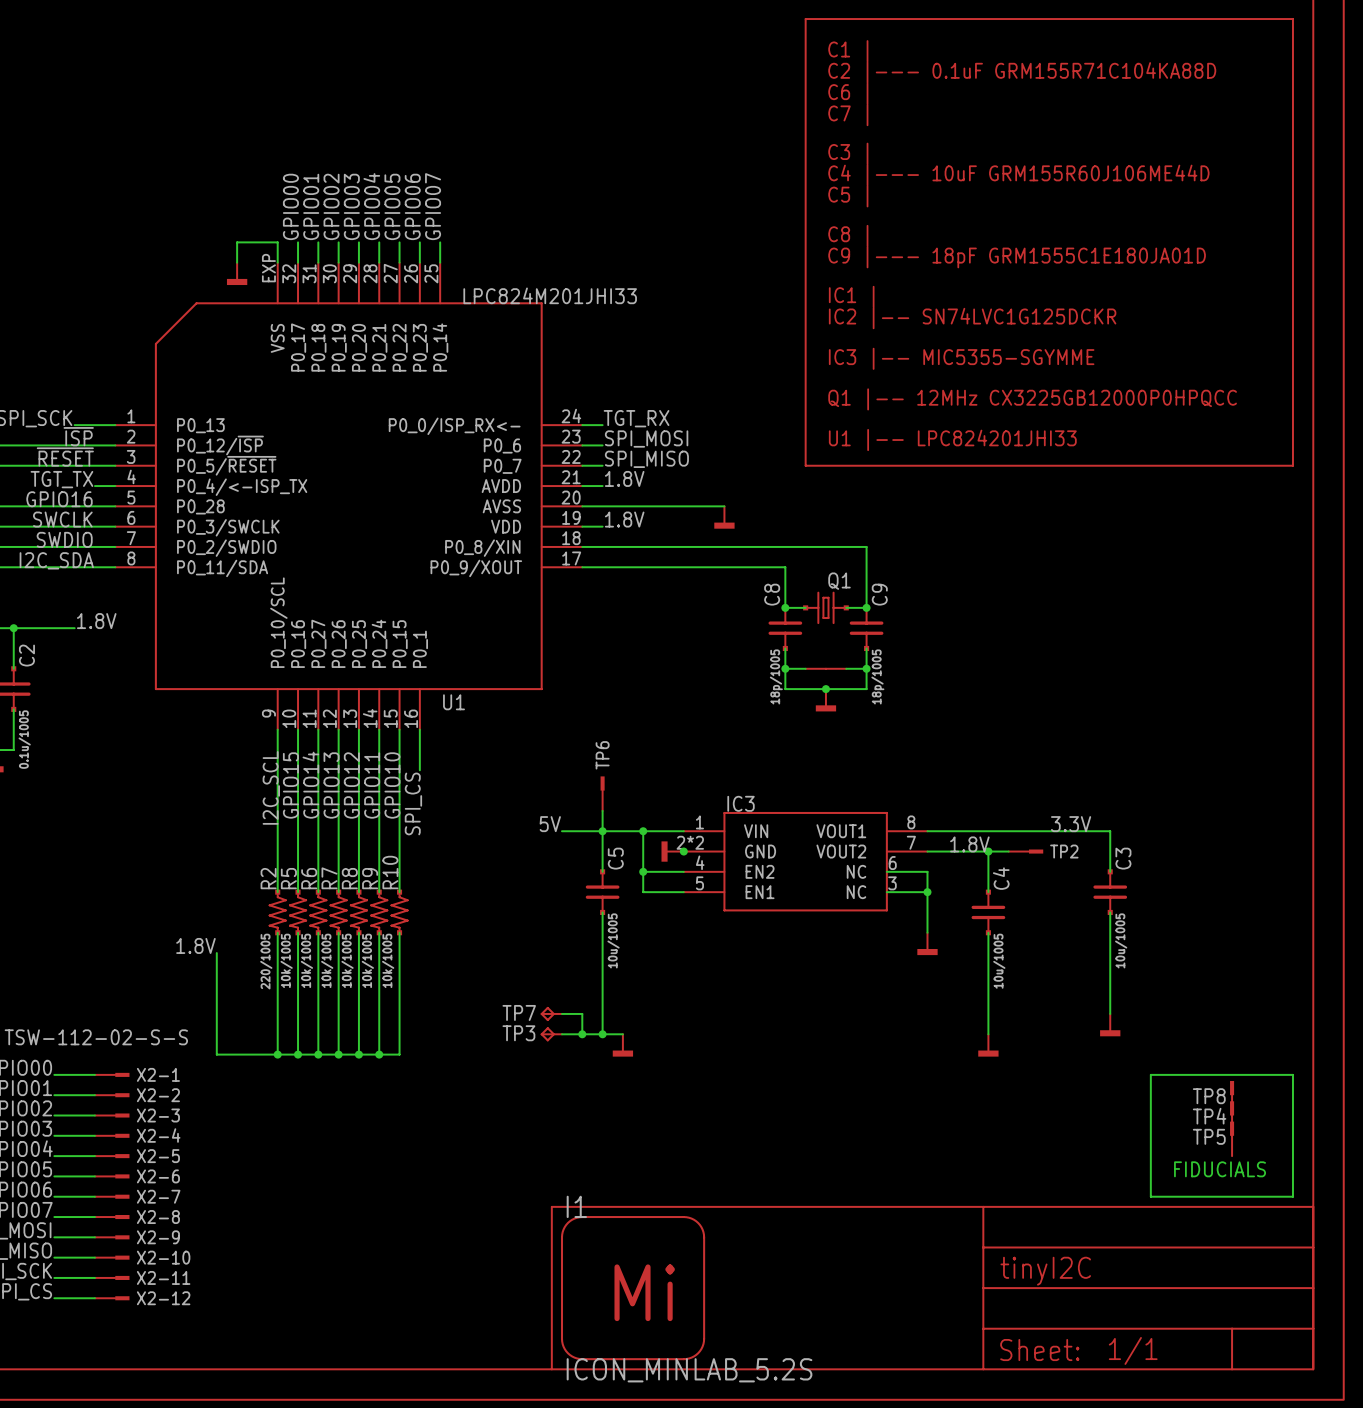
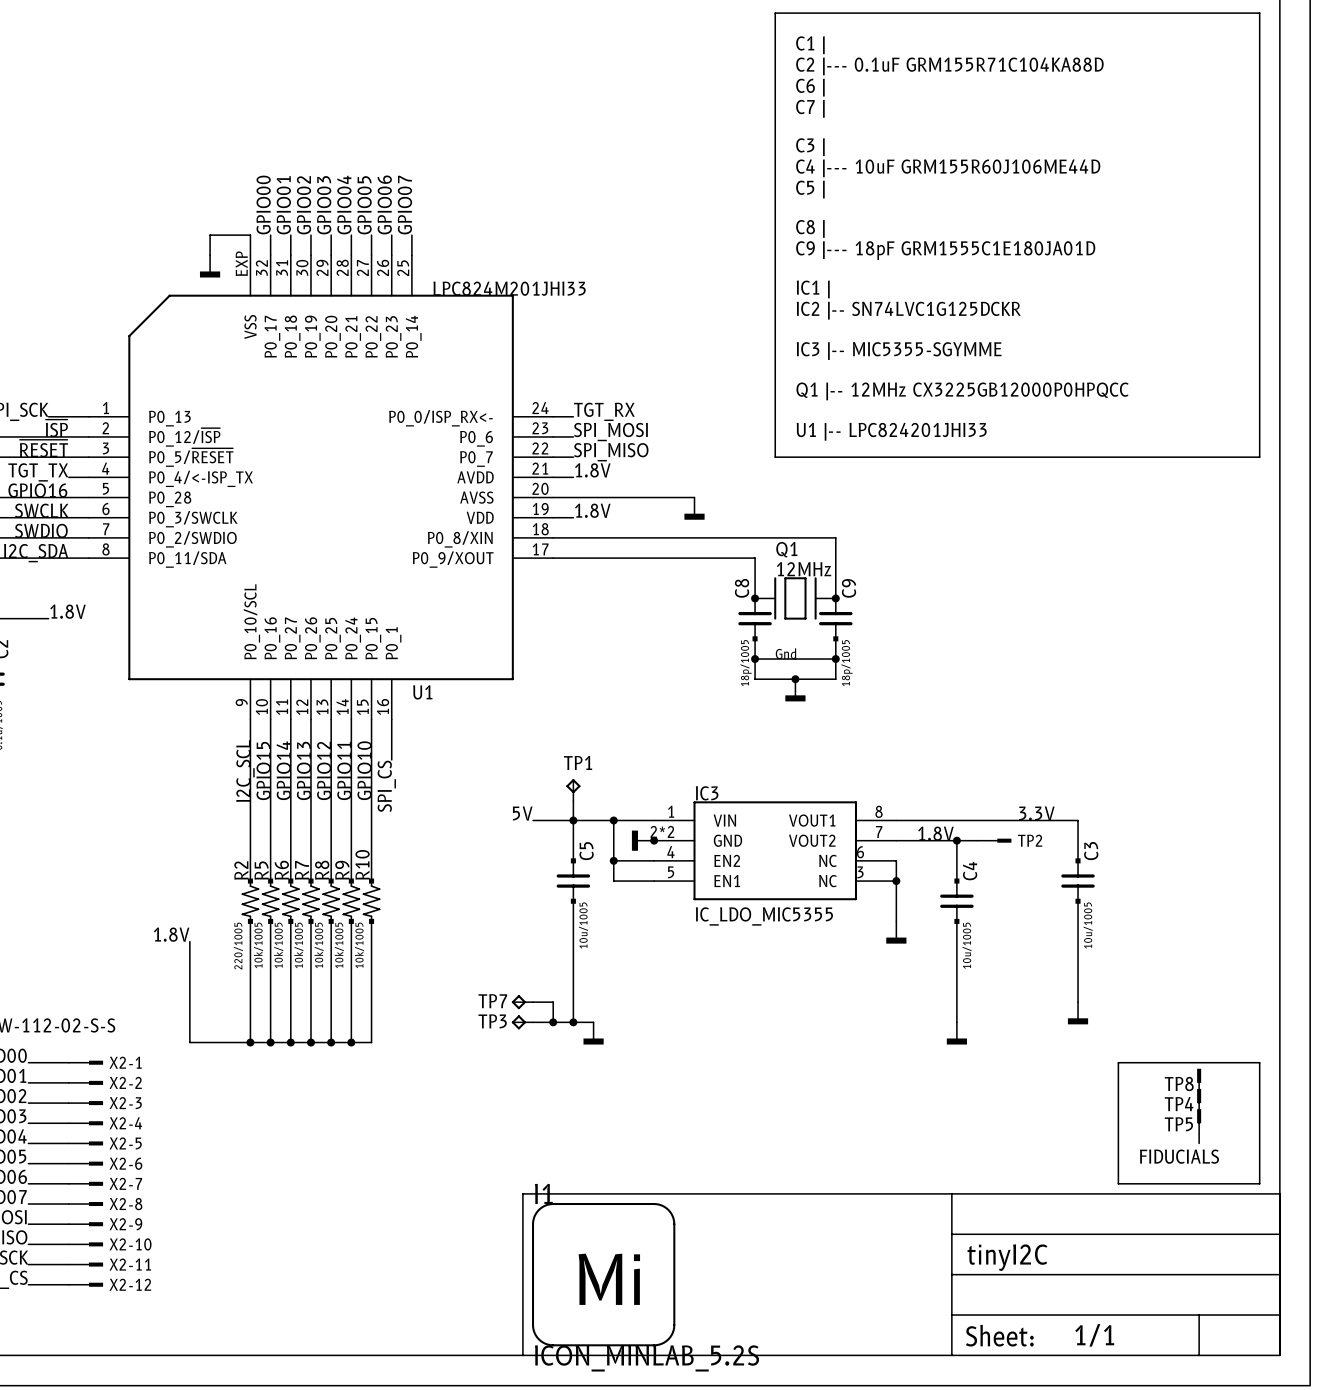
Q1 value: none -> 12MHz (804, 569)
Q1 name position: Q1 (839, 581) -> Q1 (786, 549)
Q1 symbol: [803, 592, 849, 669] -> [755, 577, 836, 660]
TP6: (602, 793) -> none
TP1: none -> (573, 789)
IC3 value: none -> IC_LDO_MIC5355 (764, 916)

